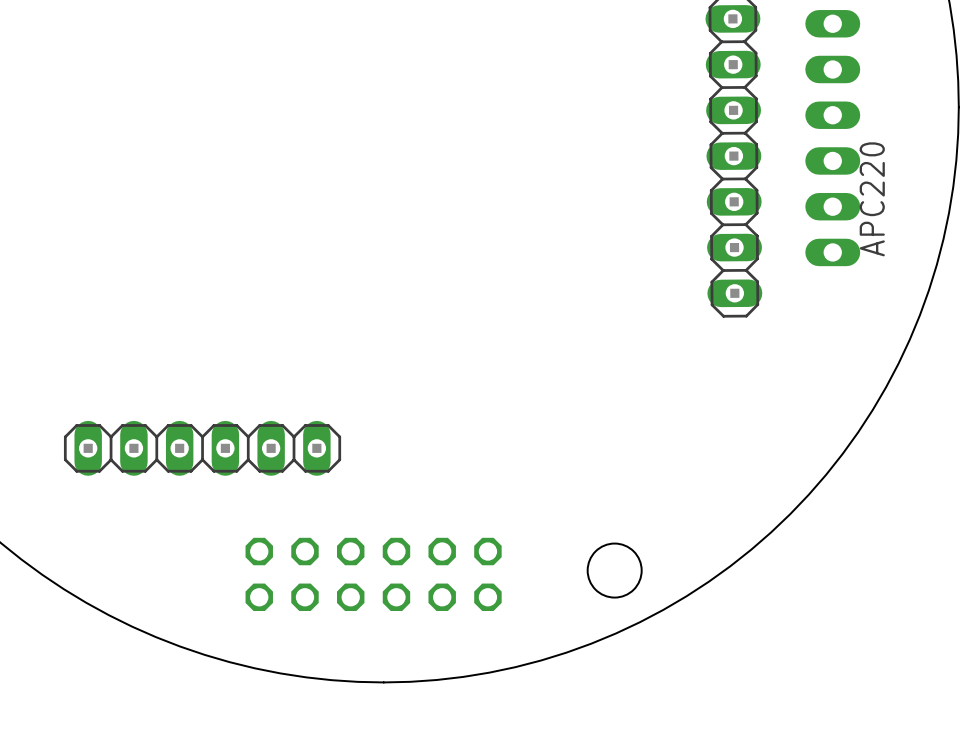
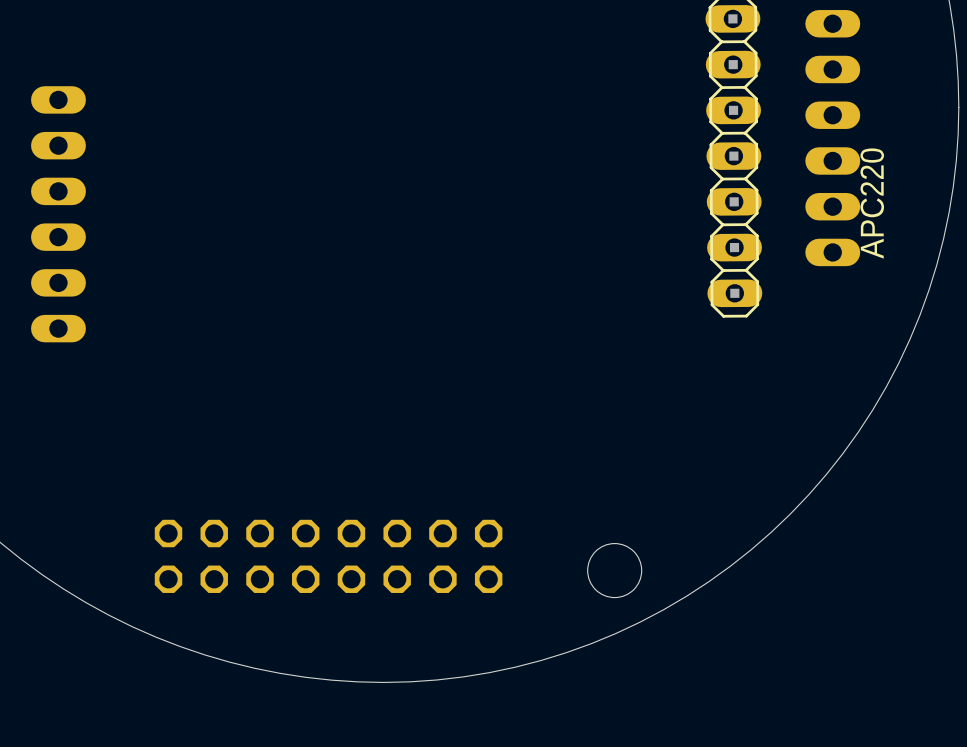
part: none -> (58, 214)
part: (202, 448) -> none
part: none -> (328, 556)
part: (373, 574) -> none

